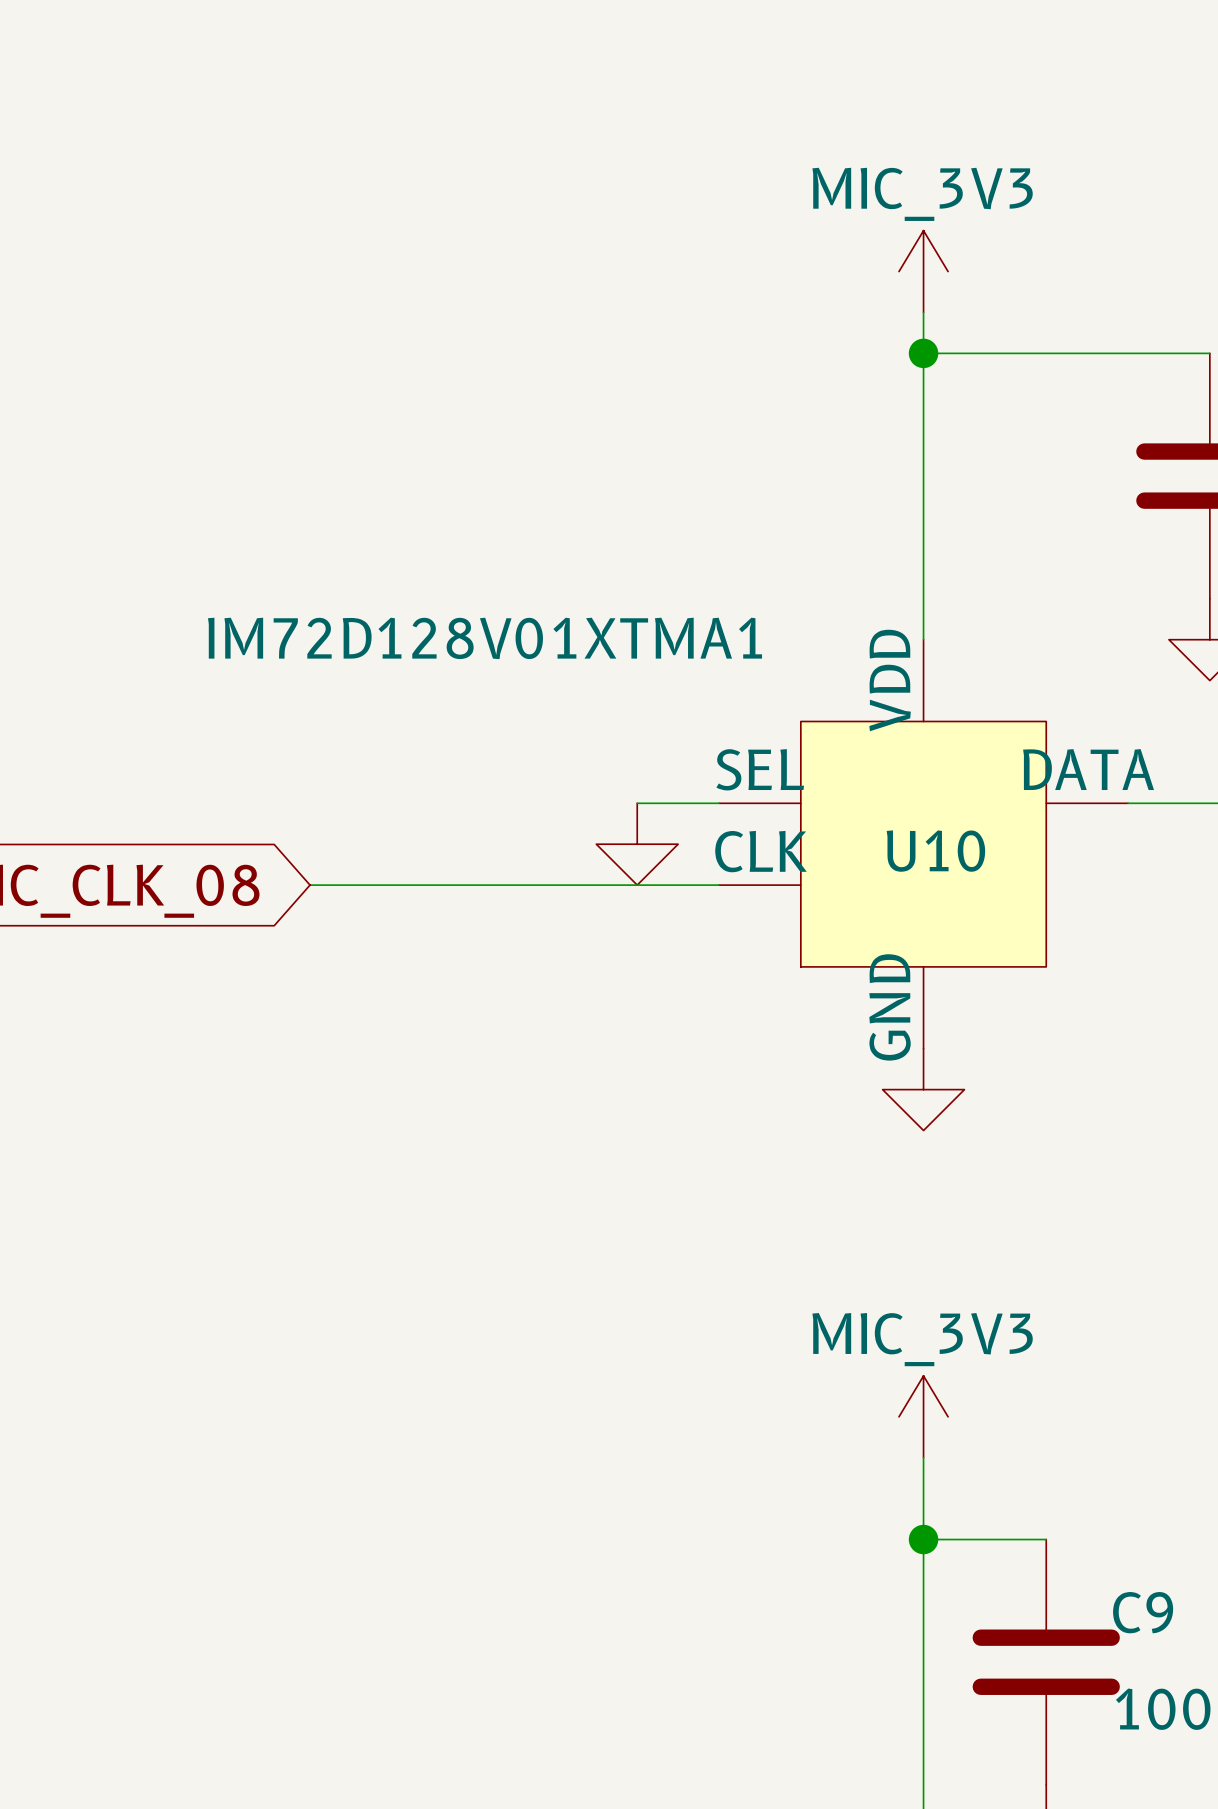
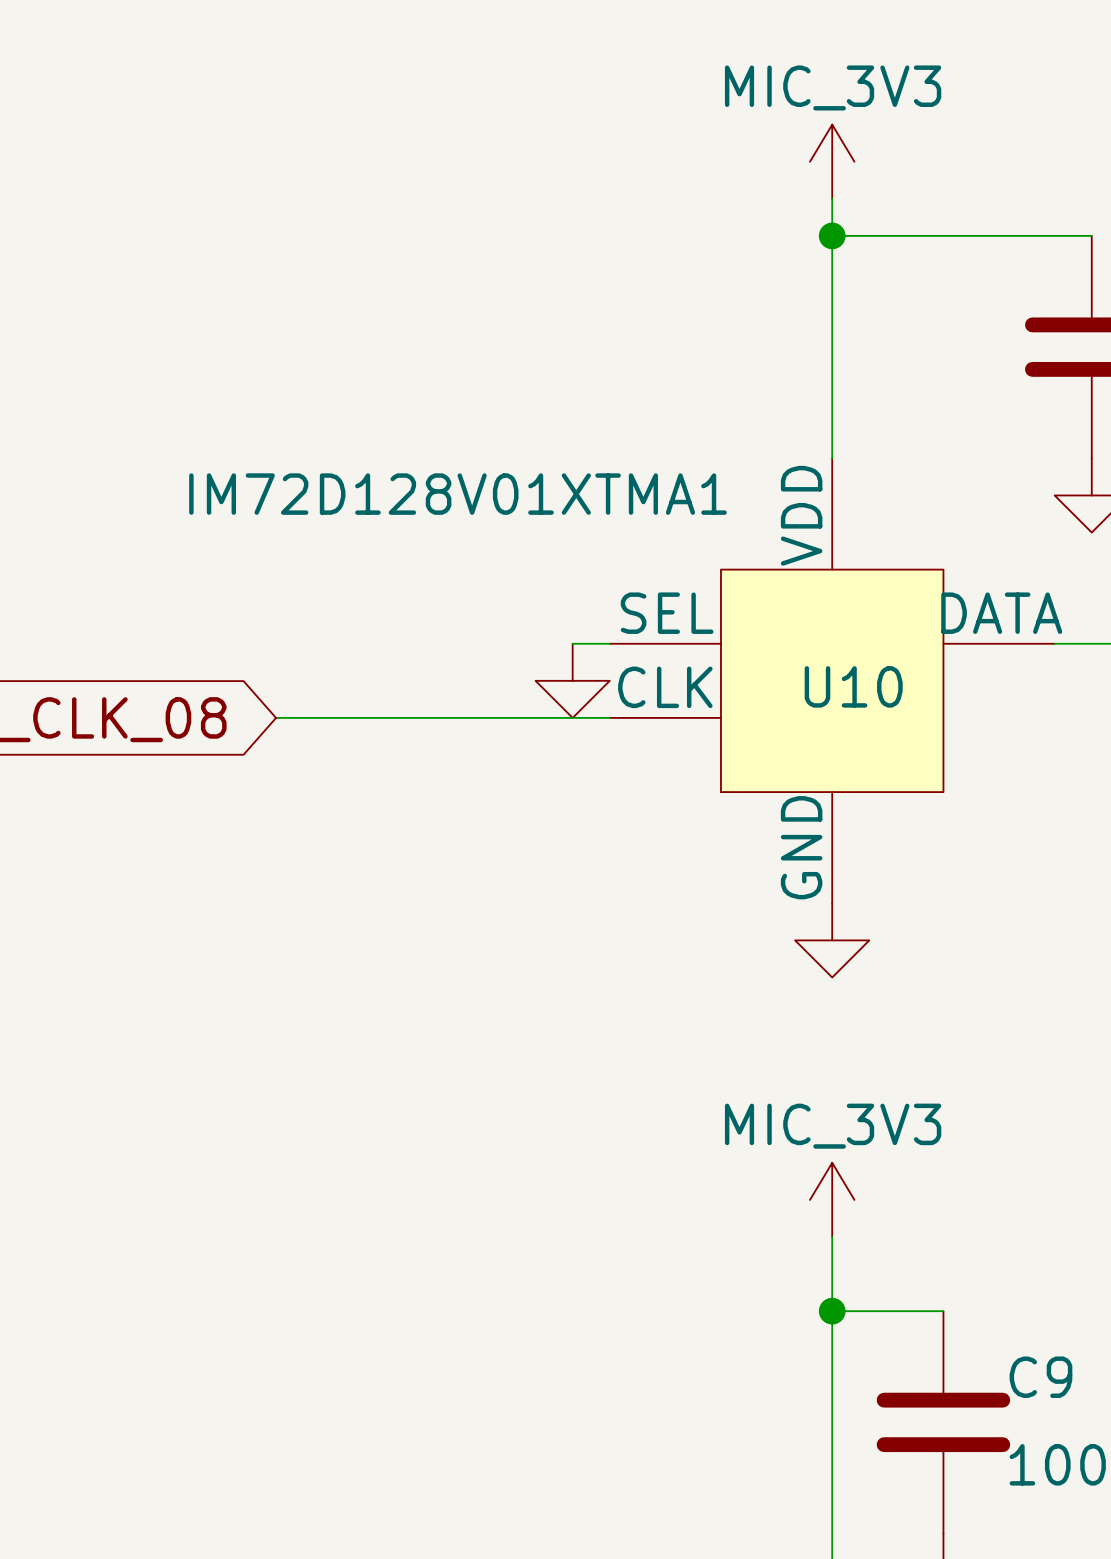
U10 symbol: [719, 639, 1129, 1049] -> [609, 458, 1055, 904]
power symbol position: (923, 1089) -> (832, 940)

